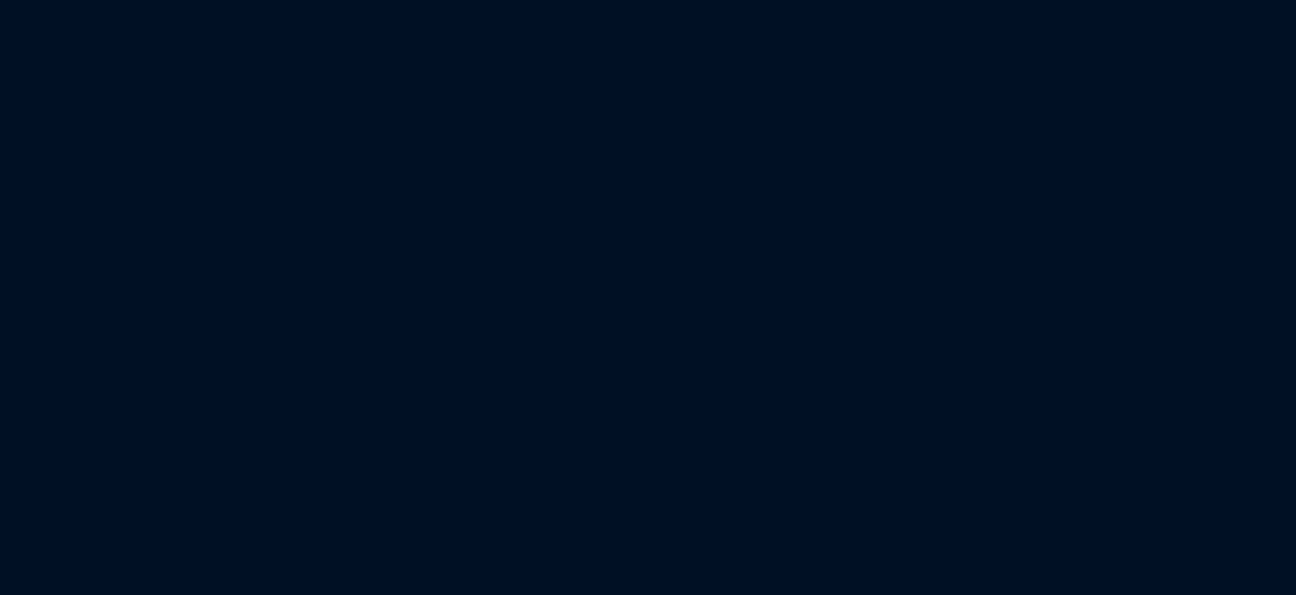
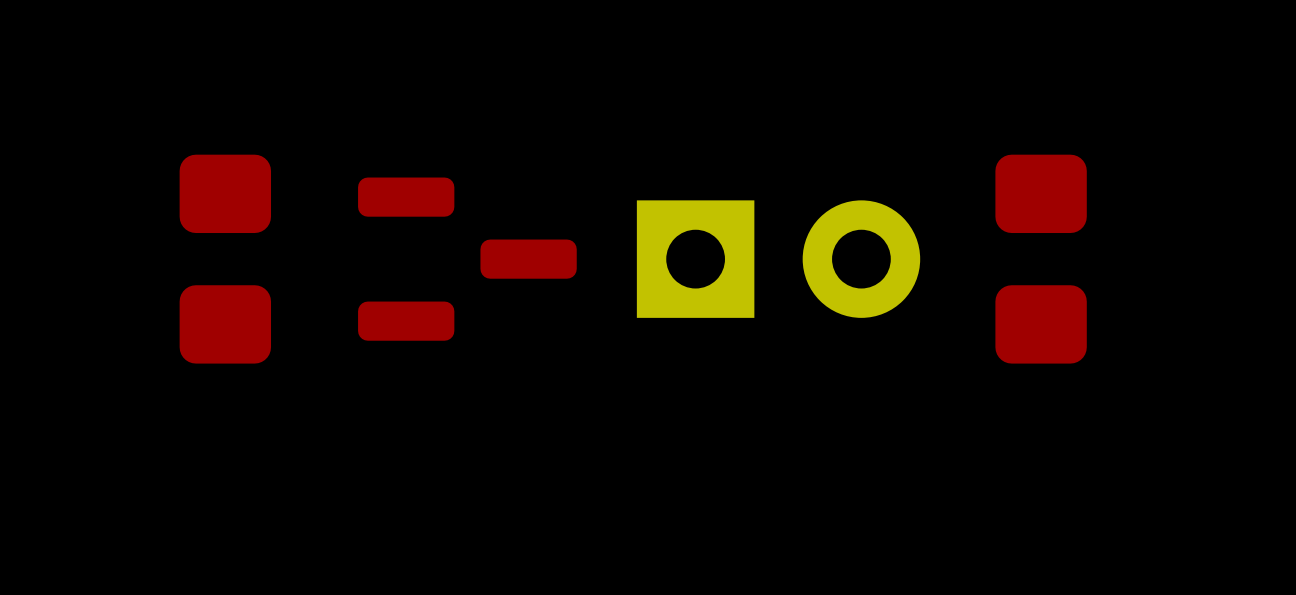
part: none -> (225, 259)
part: none -> (467, 259)
part: none -> (778, 259)
part: none -> (1041, 259)

